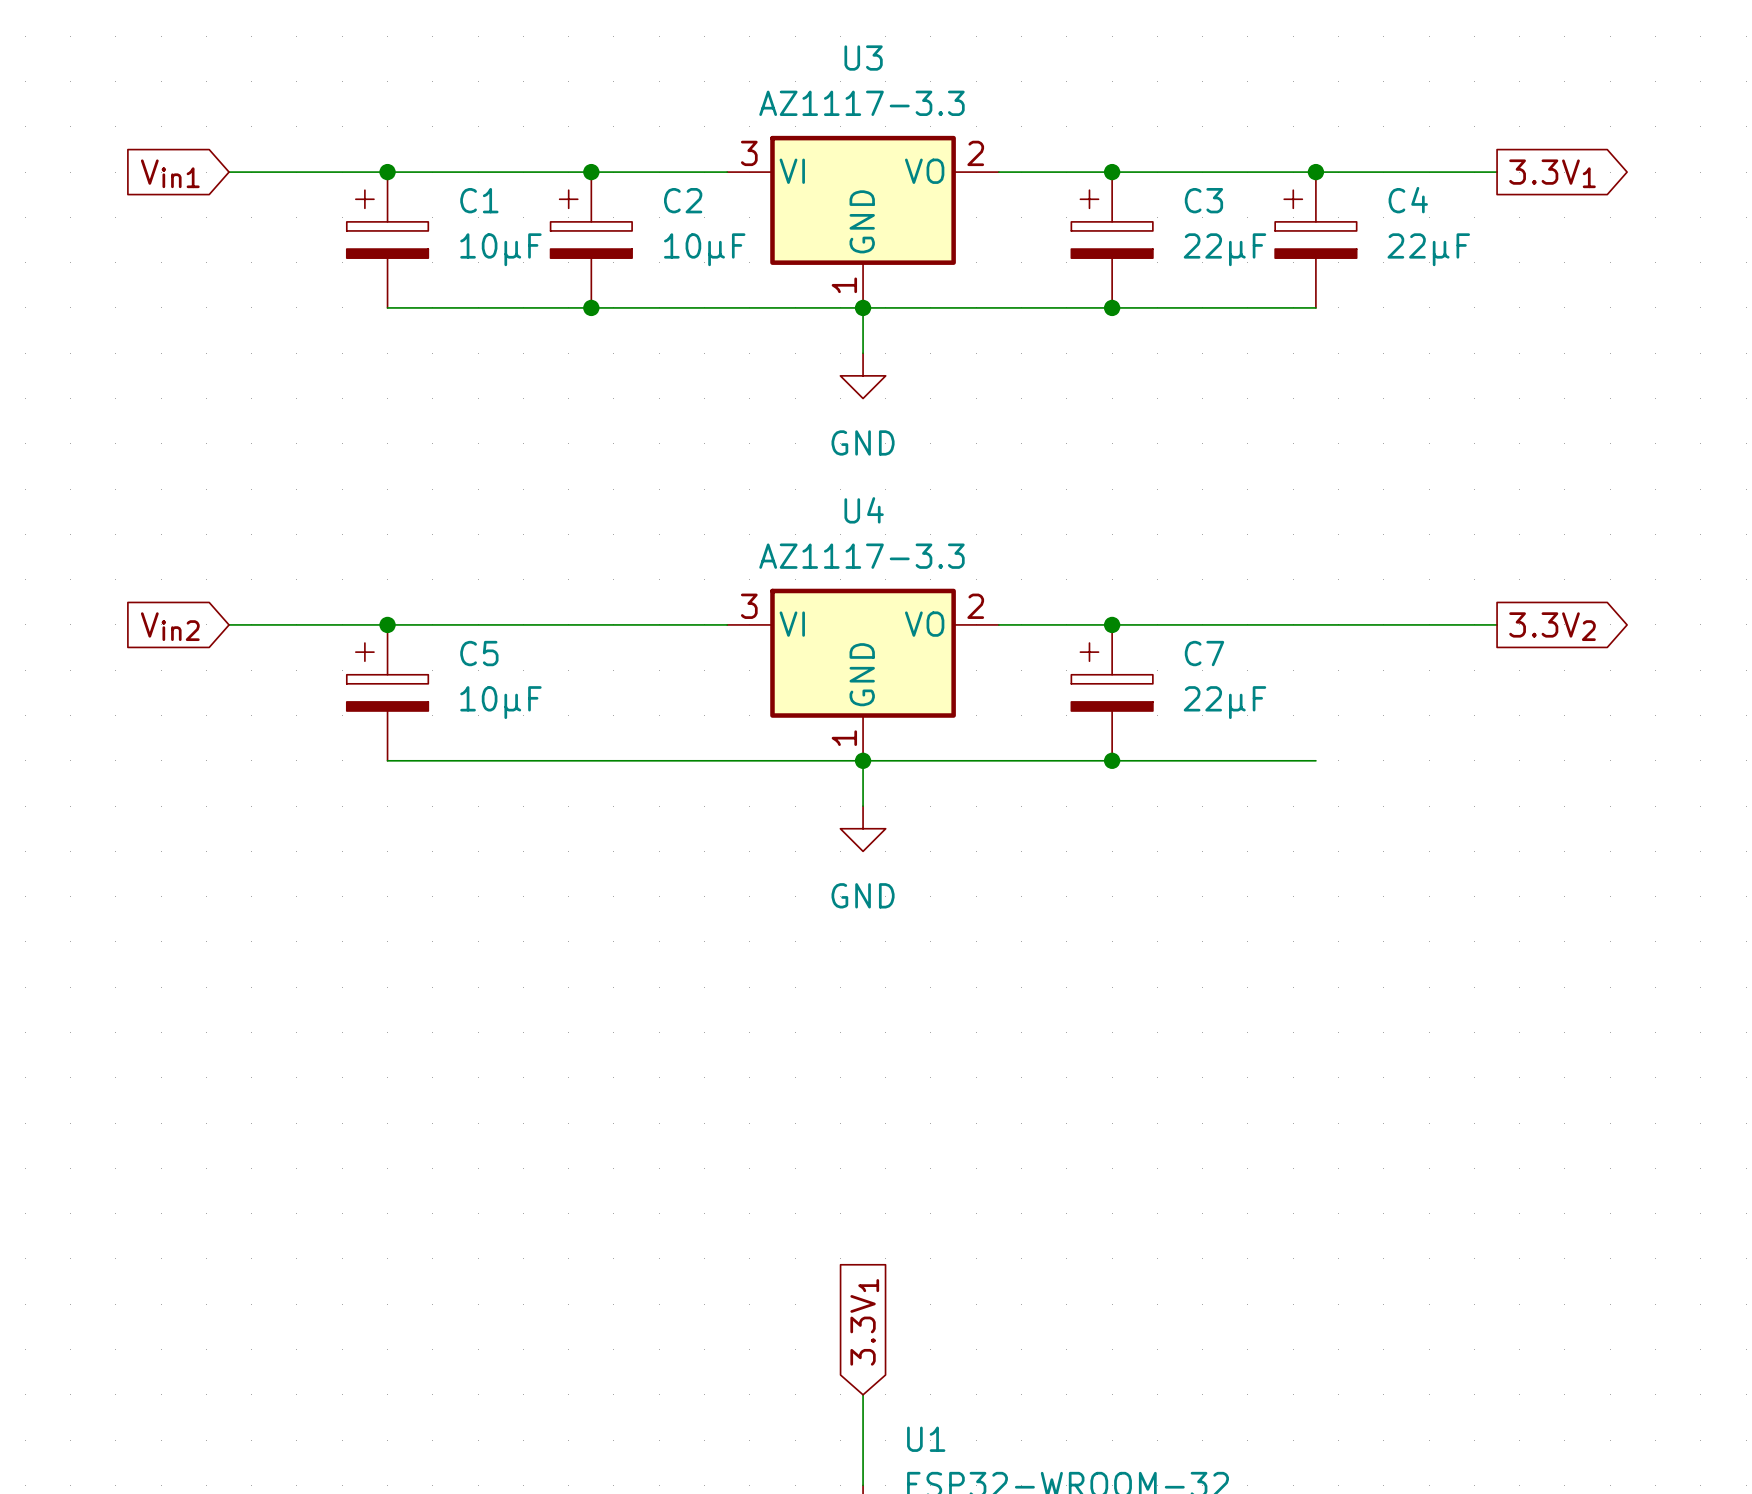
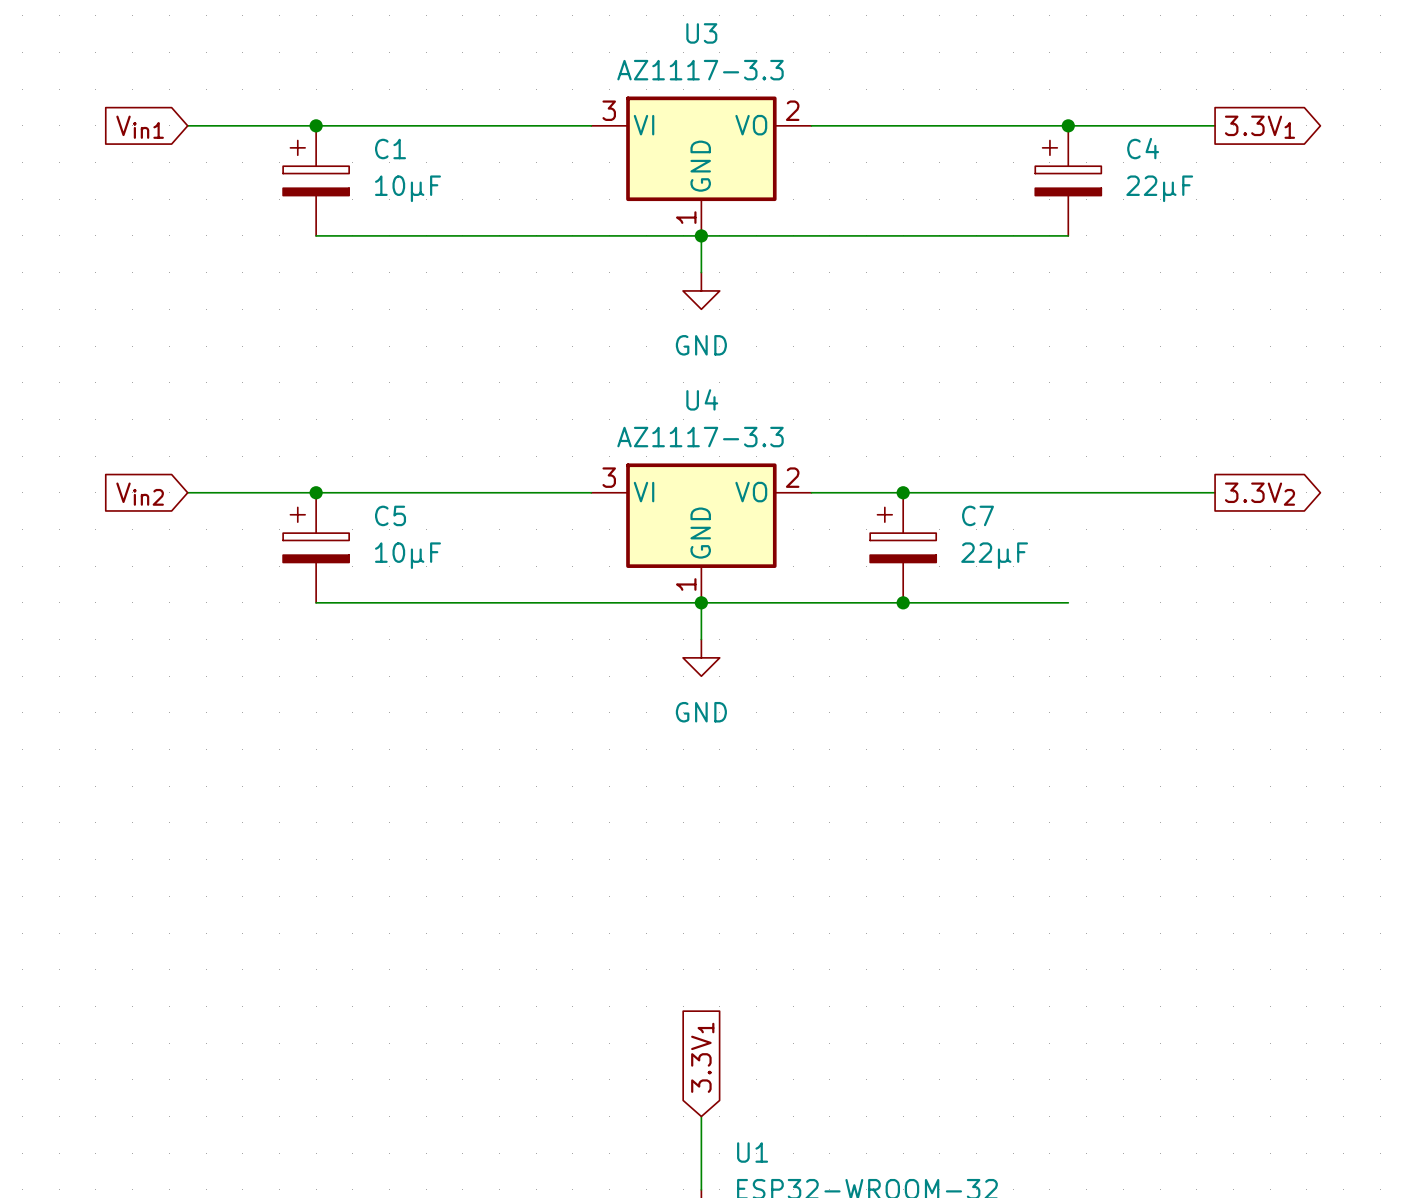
junction: (591, 172) -> none
junction: (1112, 172) -> none
C2: 10μF (591, 240) -> none
C3: 22μF (1112, 240) -> none
junction: (591, 307) -> none
junction: (1112, 307) -> none

